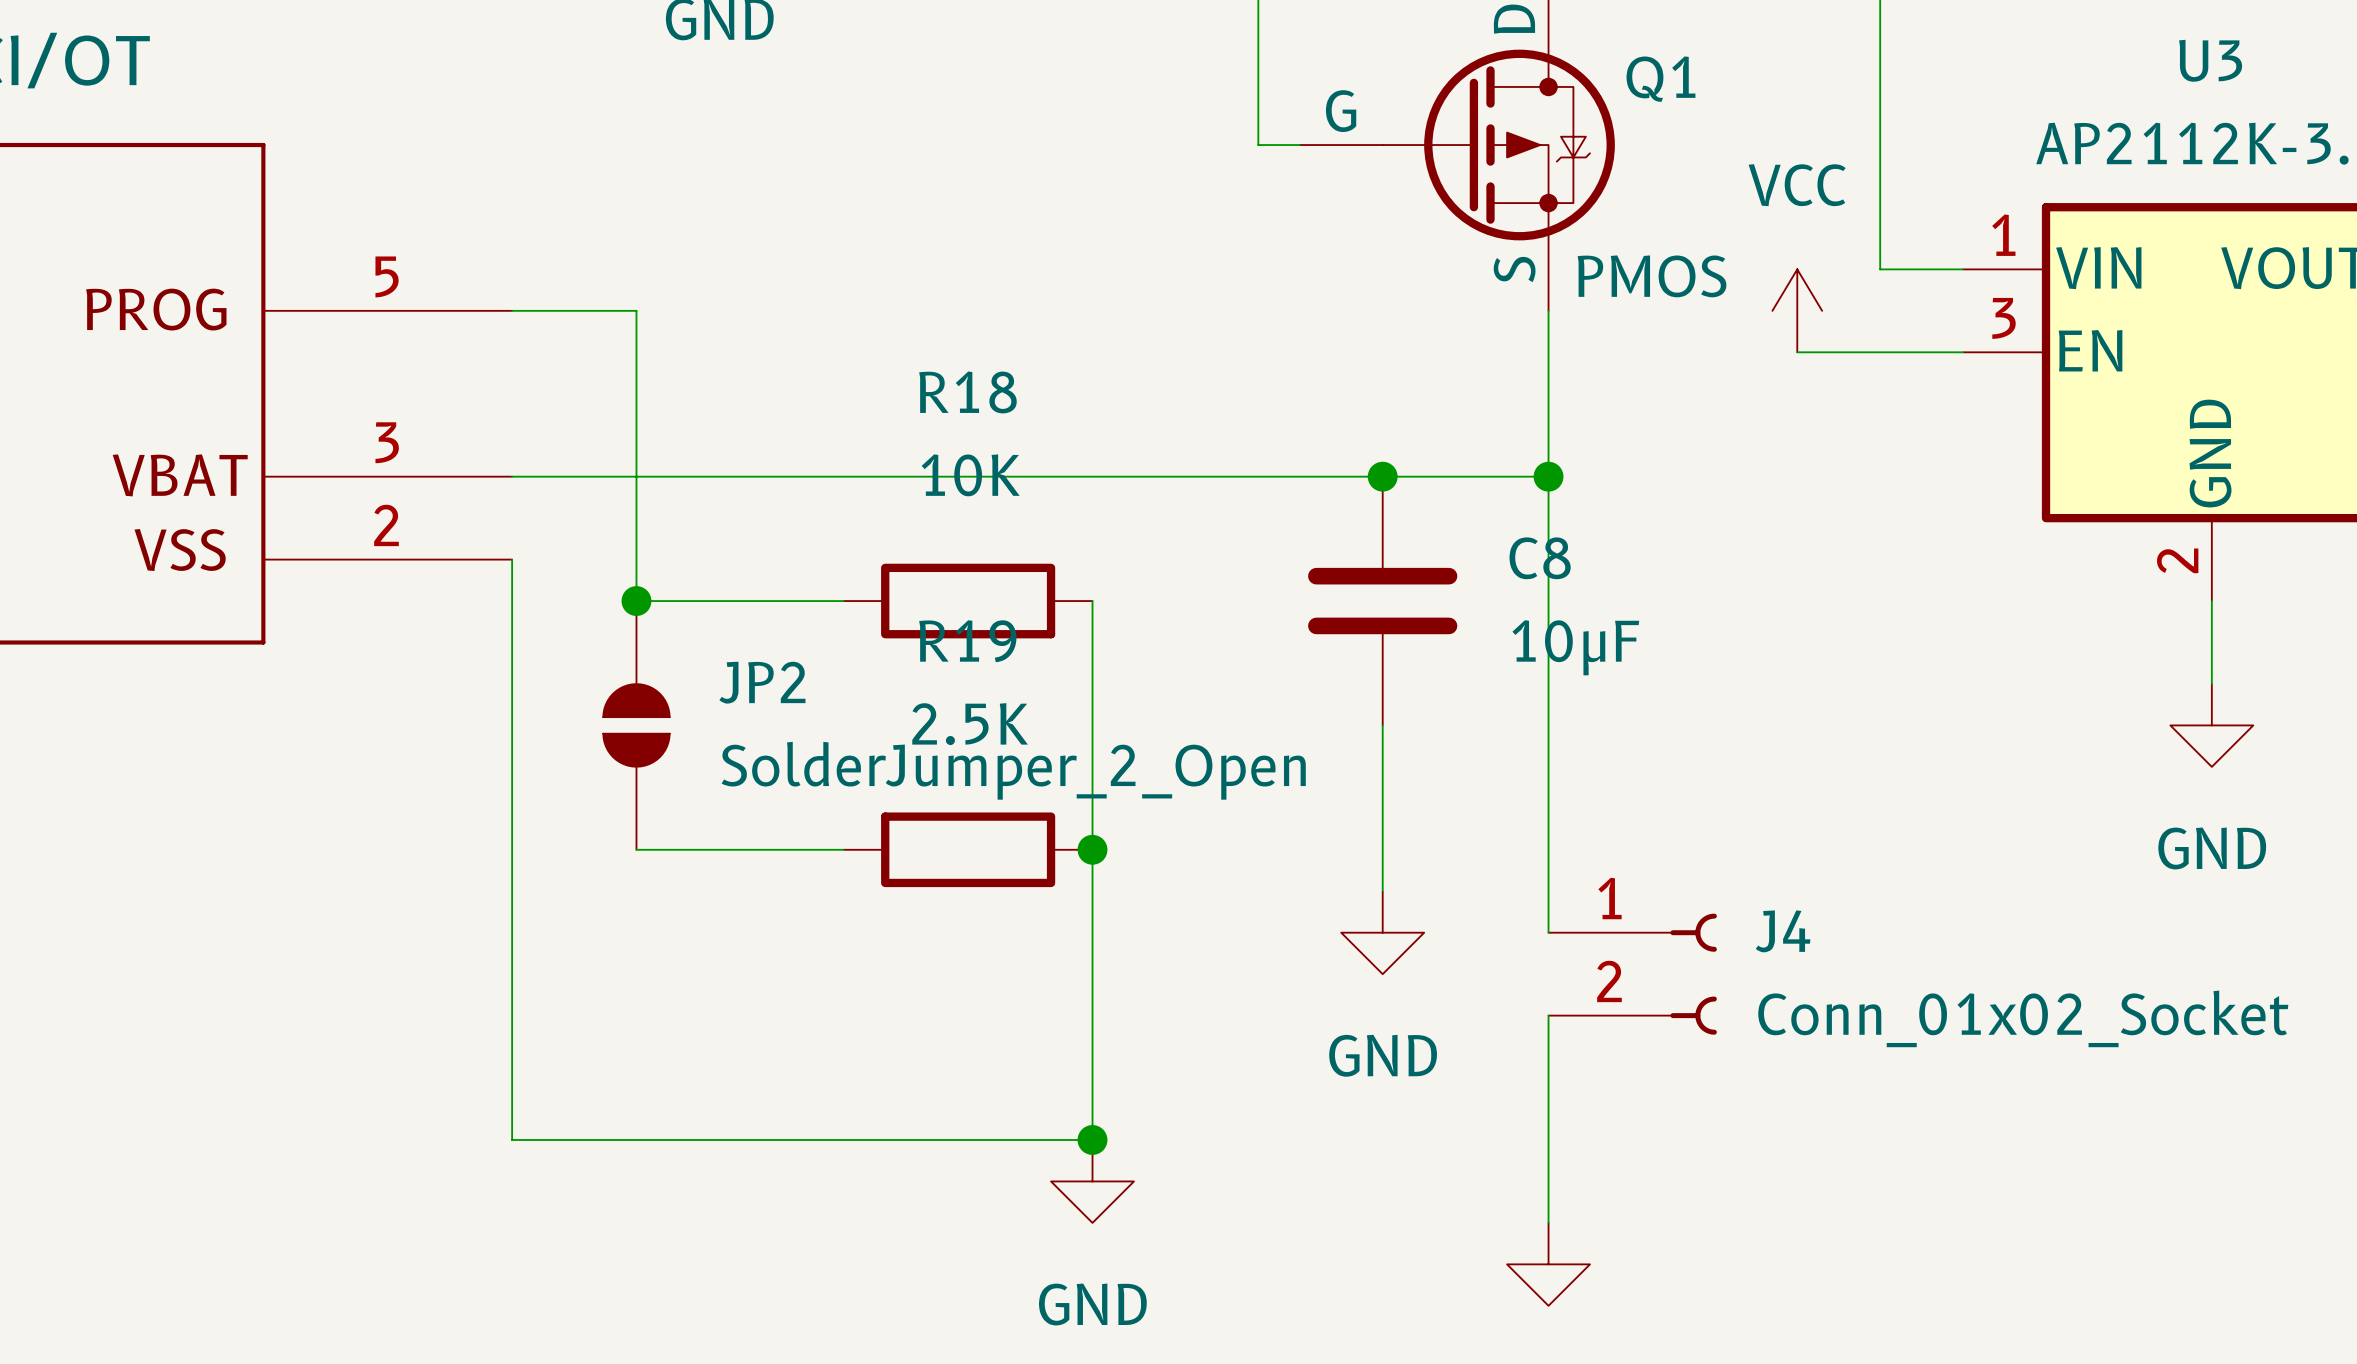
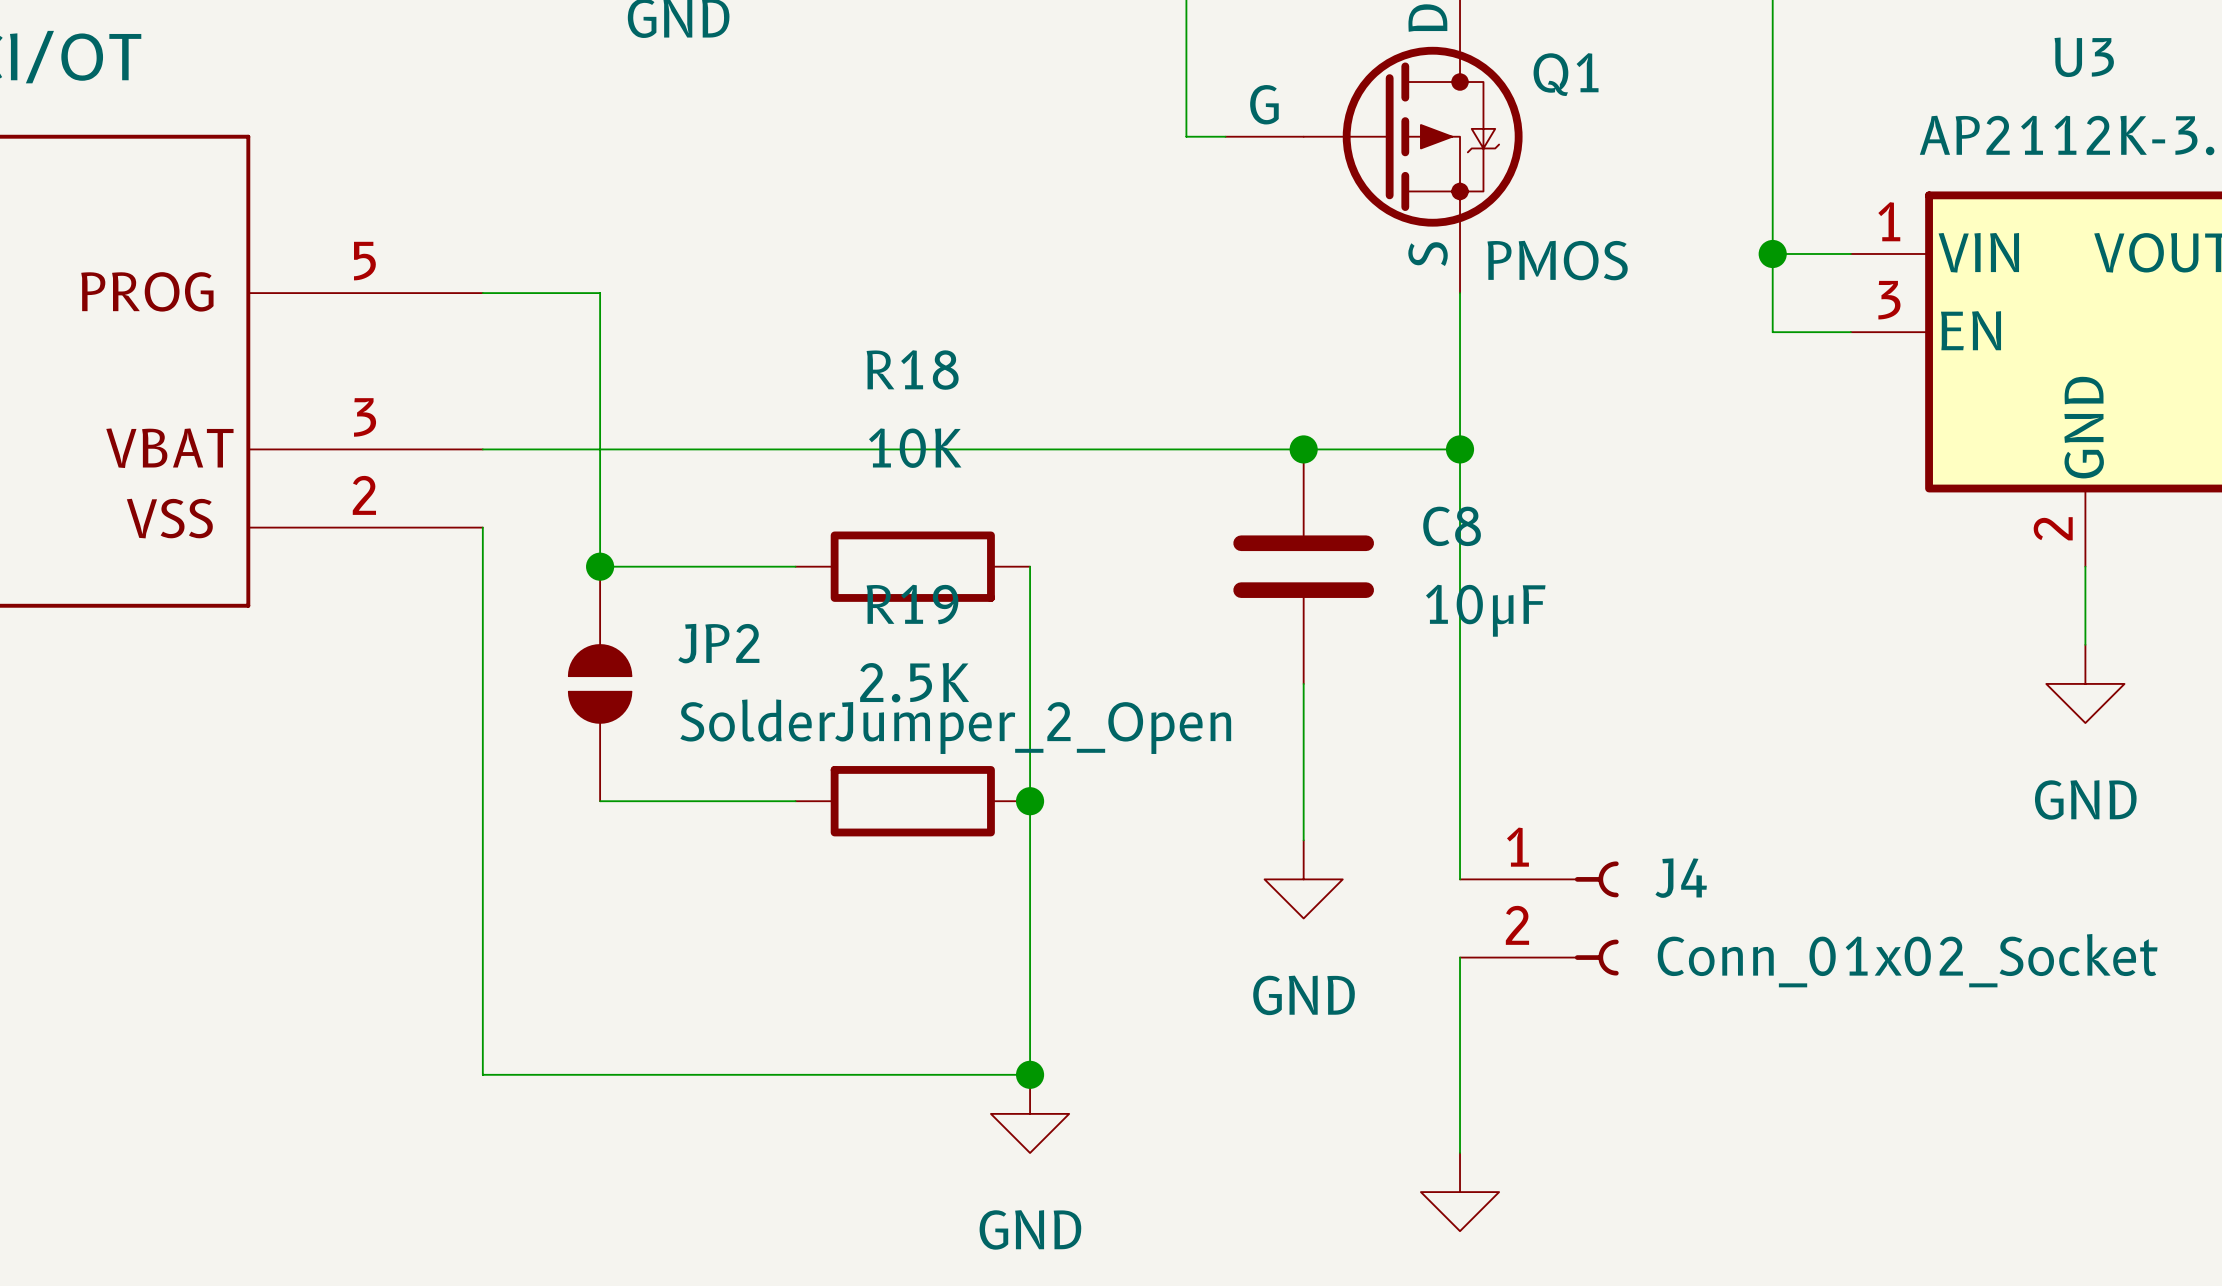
junction: none -> (1772, 253)
power symbol: VCC (1797, 310) -> none
wire: (1797, 352) (1880, 352) -> (1772, 253) (1772, 332)

